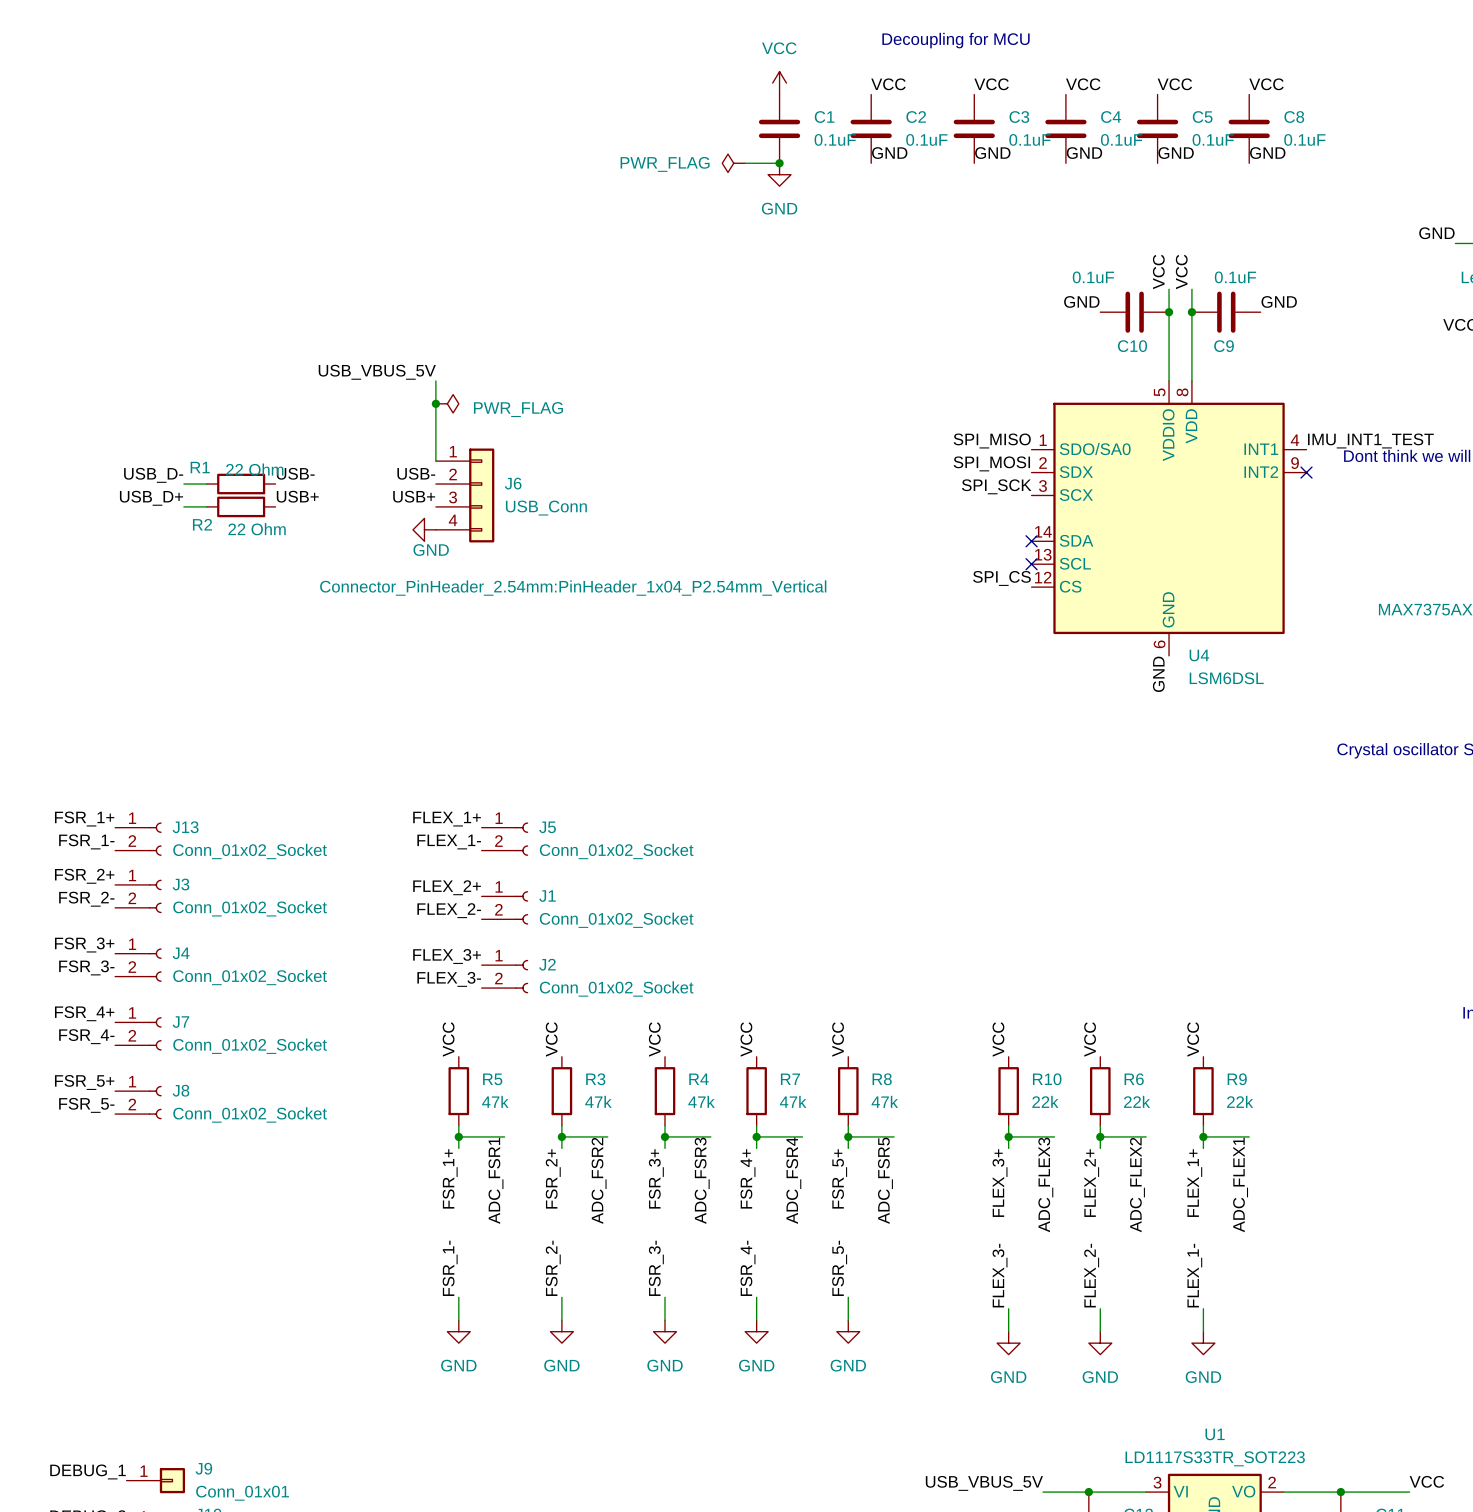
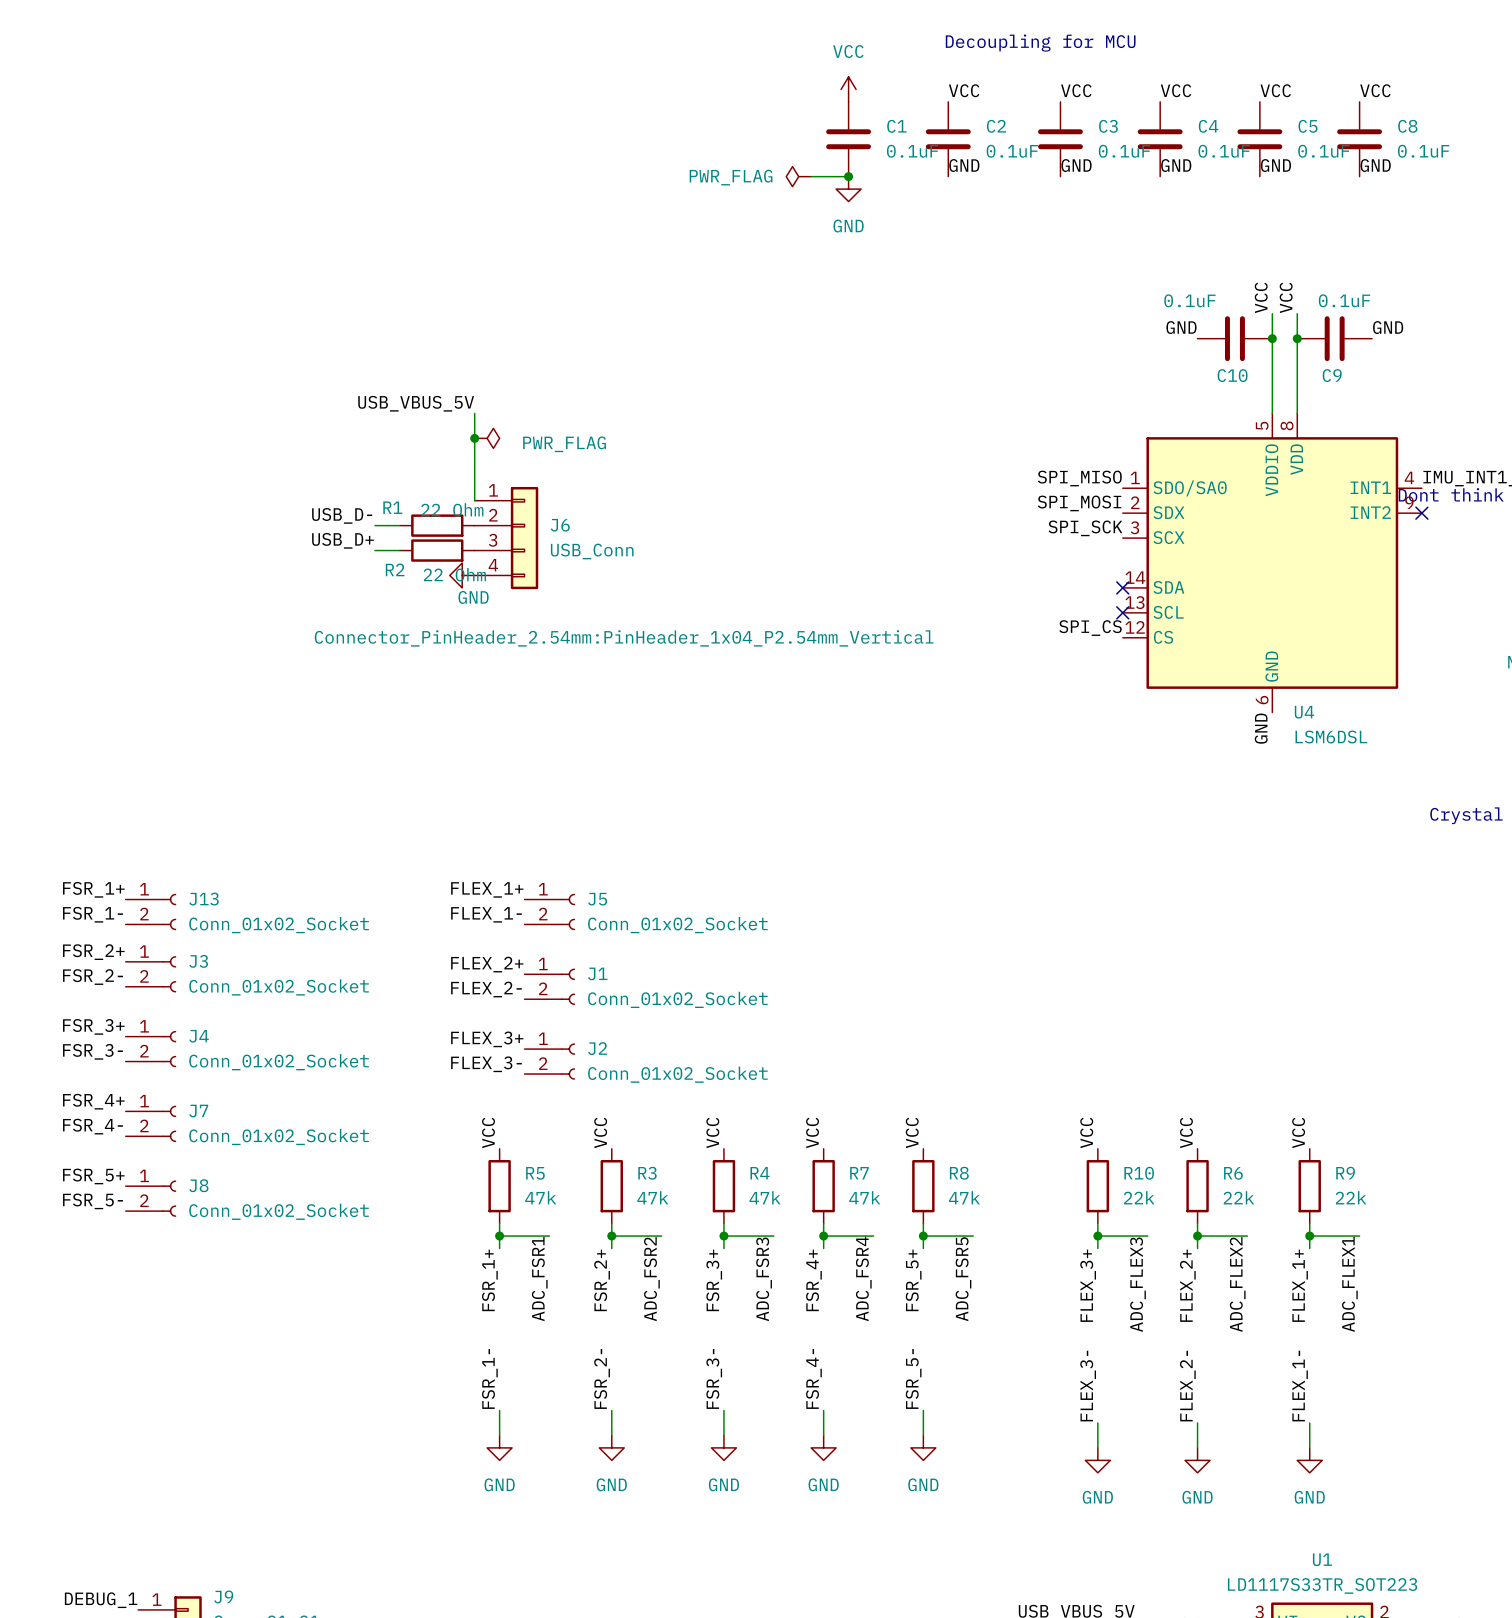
label: USB- (295, 473) -> none
label: USB- (416, 473) -> none
label position: USB_D- (153, 475) -> USB_D- (342, 515)
wire: (183, 484) (206, 484) -> (374, 525) (399, 525)
R1 position: (241, 484) -> (437, 525)
label: USB+ (297, 496) -> none
label: USB+ (414, 496) -> none
label position: USB_D+ (151, 498) -> USB_D+ (342, 540)
wire: (183, 506) (206, 506) -> (374, 550) (399, 550)
R2 position: (241, 506) -> (437, 550)

